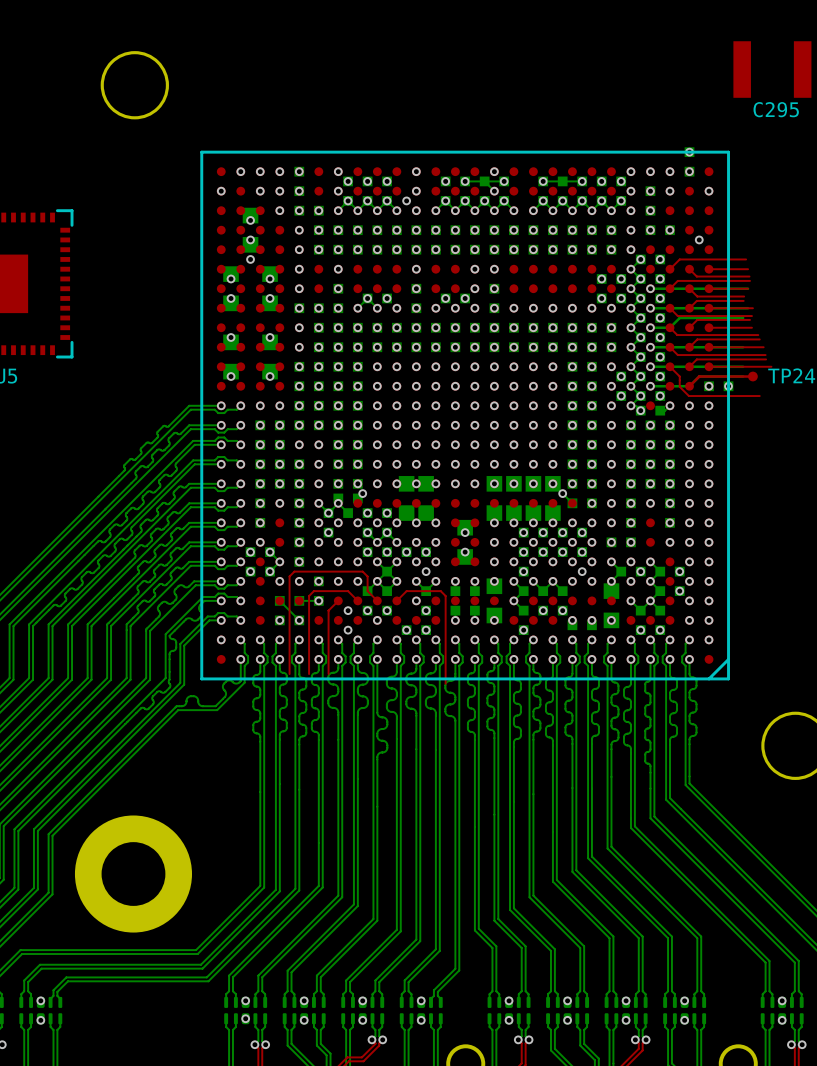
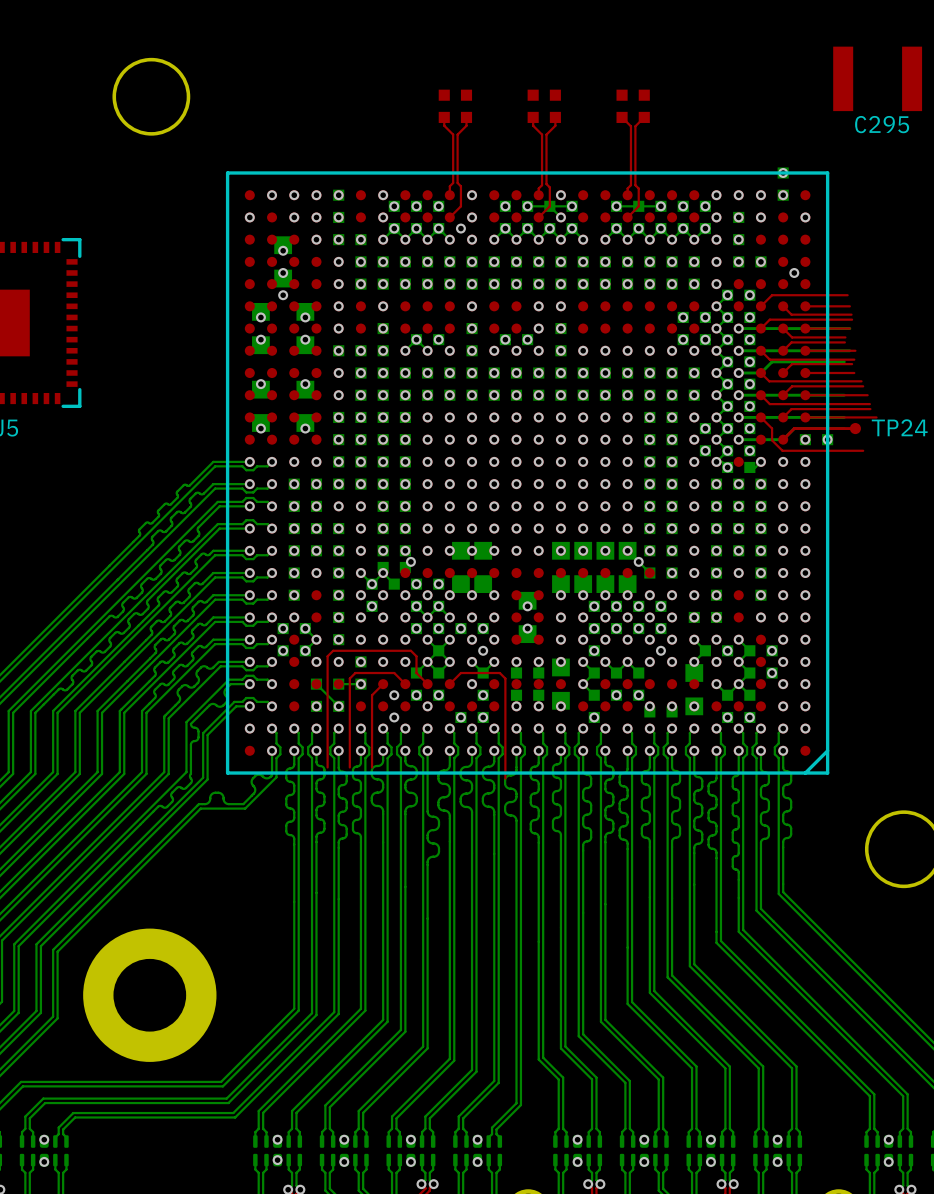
part: none -> (444, 106)
part: none -> (466, 106)
part: none -> (533, 106)
part: none -> (555, 106)
part: none -> (622, 106)
part: none -> (644, 106)
top track: none -> (444, 117) (444, 125) (453, 134) (453, 182) (449, 186) (449, 195)
top track: none -> (466, 117) (466, 125) (457, 134) (457, 182) (460, 186) (460, 206) (449, 217)
top track: none -> (533, 117) (533, 125) (542, 134) (542, 185) (538, 188) (538, 195)
top track: none -> (555, 117) (555, 125) (546, 134) (546, 184) (549, 187) (549, 206) (538, 217)
top track: none -> (622, 117) (630, 126) (630, 185) (627, 188) (627, 195)
top track: none -> (644, 117) (635, 126) (635, 185) (638, 188) (638, 206) (627, 217)

